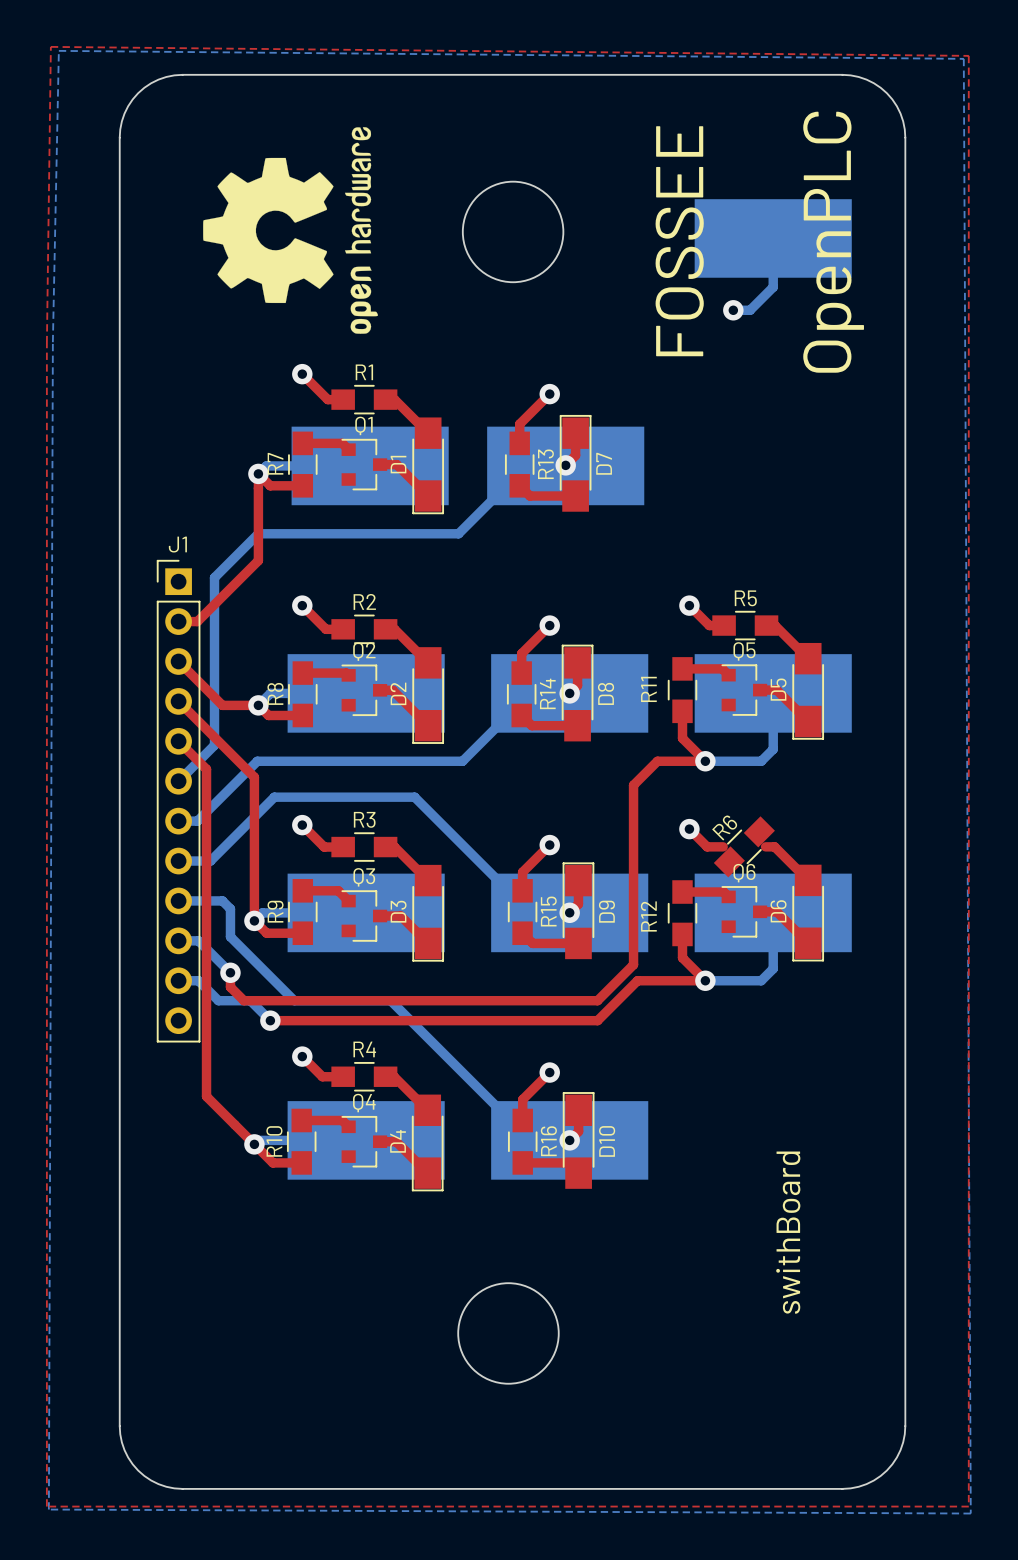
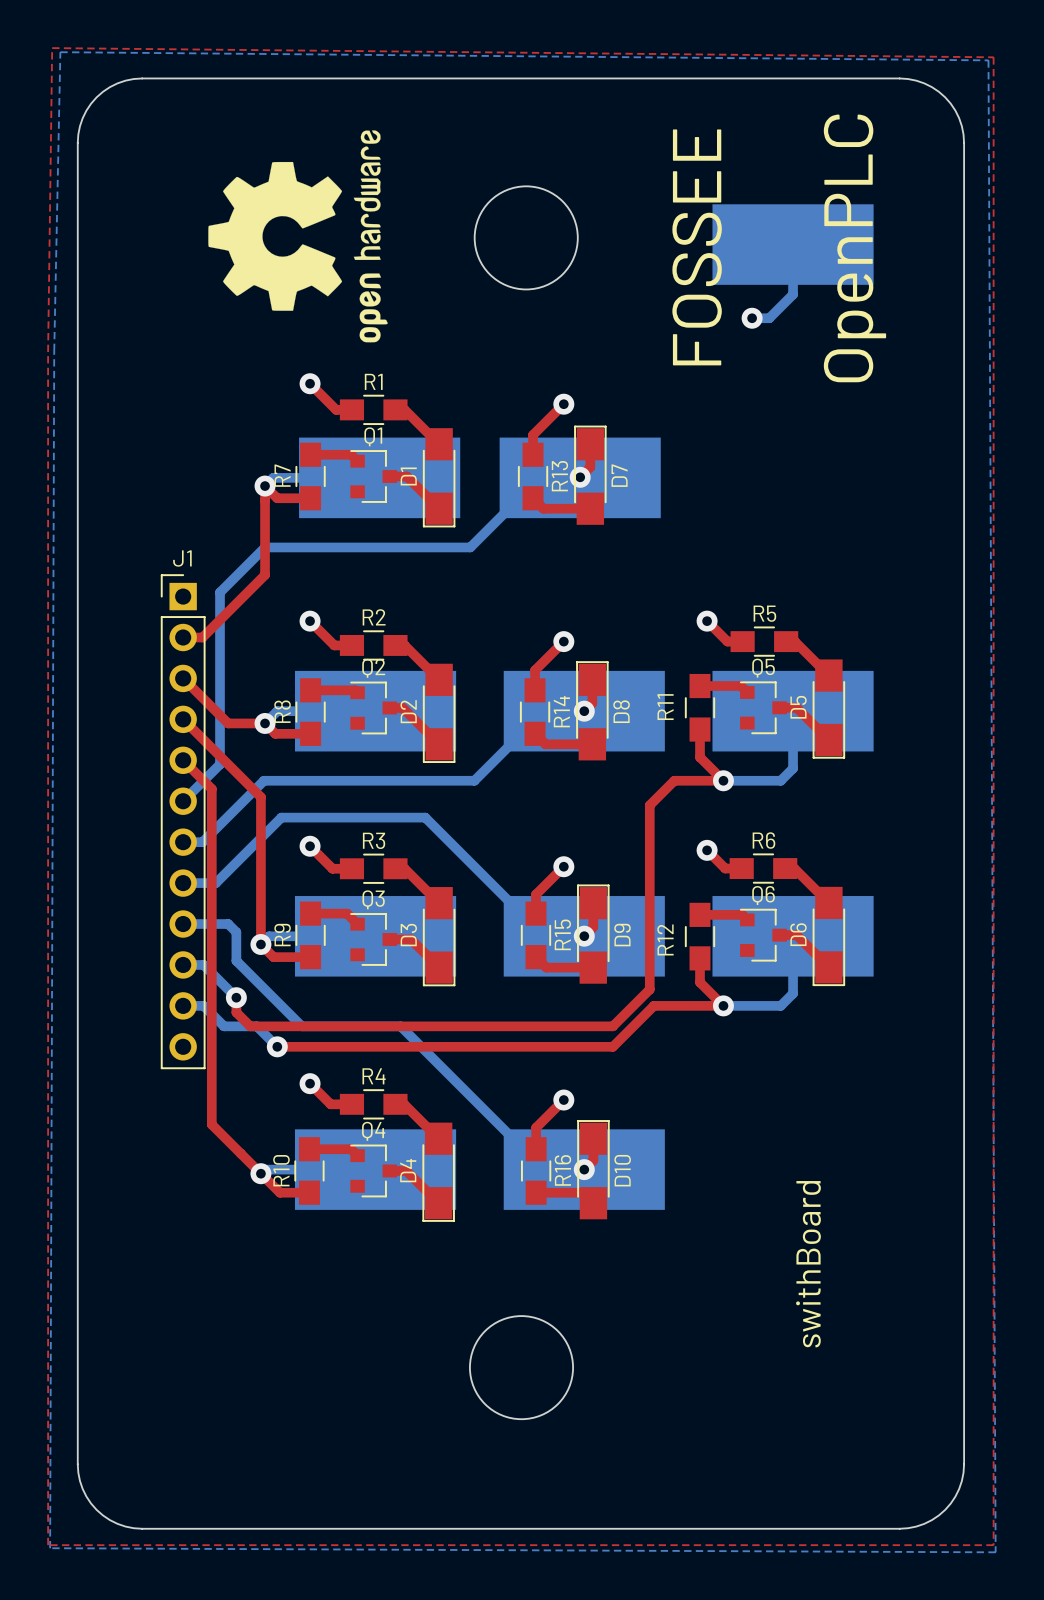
board edge: (182, 74) (842, 74) (866, 79) (880, 87) (892, 99) (900, 113) (905, 137) (905, 1426) (903, 1442) (896, 1457) (880, 1475) (866, 1484) (842, 1488) (182, 1488) (166, 1486) (151, 1480) (132, 1464) (124, 1450) (119, 1426) (119, 137) (124, 113) (138, 93) (158, 79) (182, 74) -> (142, 78) (117, 83) (96, 97) (82, 118) (77, 142) (77, 1464) (79, 1481) (86, 1496) (96, 1509) (110, 1520) (125, 1526) (142, 1528) (899, 1528) (916, 1526) (931, 1520) (945, 1509) (955, 1496) (961, 1481) (964, 1464) (964, 142) (961, 126) (955, 110) (945, 97) (931, 87) (916, 80) (899, 78) (142, 78)
R6 rotation: 0° (744, 846) -> 45° clockwise (763, 868)

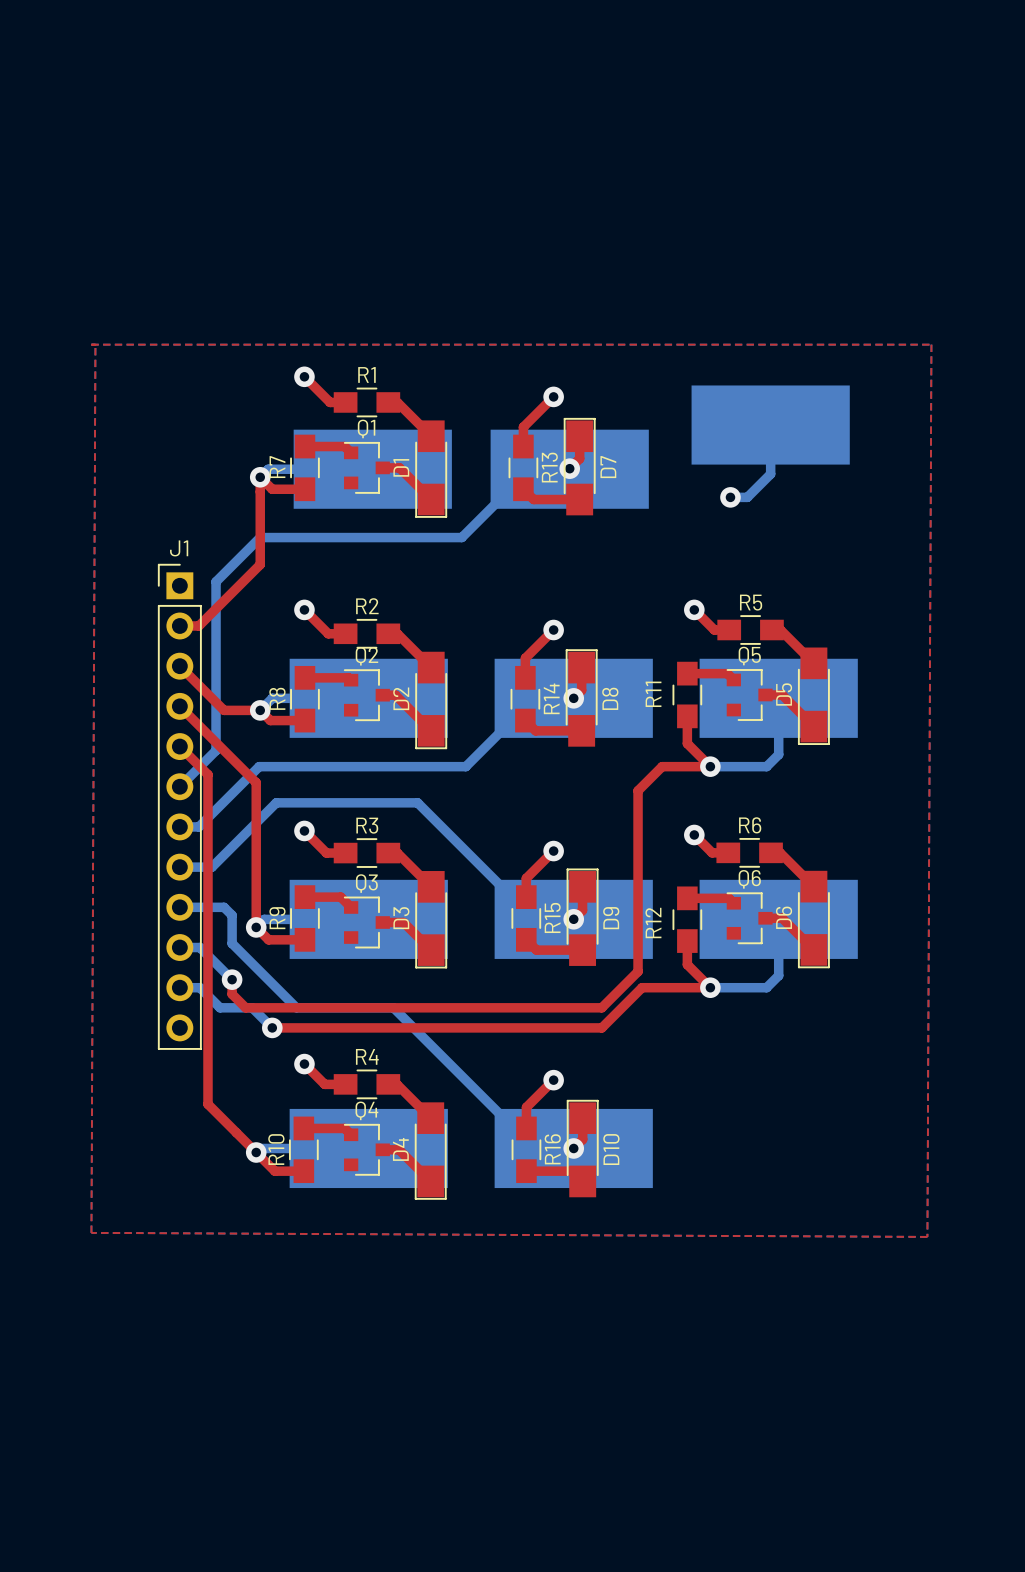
top zone outline: (52, 48) (993, 57) (993, 1545) (48, 1545) (48, 352) (52, 48) -> none
bottom zone outline: (60, 52) (988, 60) (995, 1552) (50, 1548) (54, 350) (60, 52) -> none
board edge: (142, 78) (899, 78) (916, 80) (931, 87) (945, 97) (955, 110) (961, 126) (964, 142) (964, 1464) (961, 1481) (955, 1496) (945, 1509) (931, 1520) (916, 1526) (899, 1528) (142, 1528) (125, 1526) (110, 1520) (96, 1509) (86, 1496) (79, 1481) (77, 1464) (77, 142) (82, 118) (96, 97) (117, 83) (142, 78) -> none
drawing: [208, 130, 388, 343] -> none
round board edge: [473, 185, 579, 291] -> none
bottom track: (793, 244) (793, 294) (769, 318) (752, 318) -> (770, 425) (770, 474) (747, 497) (730, 497)
part position: (793, 244) -> (770, 425)
text: FOSSEE (697, 247) -> none
text: OpenPLC (854, 248) -> none
via: (752, 318) -> none
top zone outline: none -> (91, 344) (931, 344) (927, 1236) (91, 1232) (95, 344)
via: none -> (730, 497)
text: swithBoard (808, 1264) -> none
round board edge: [469, 1315, 574, 1421] -> none

